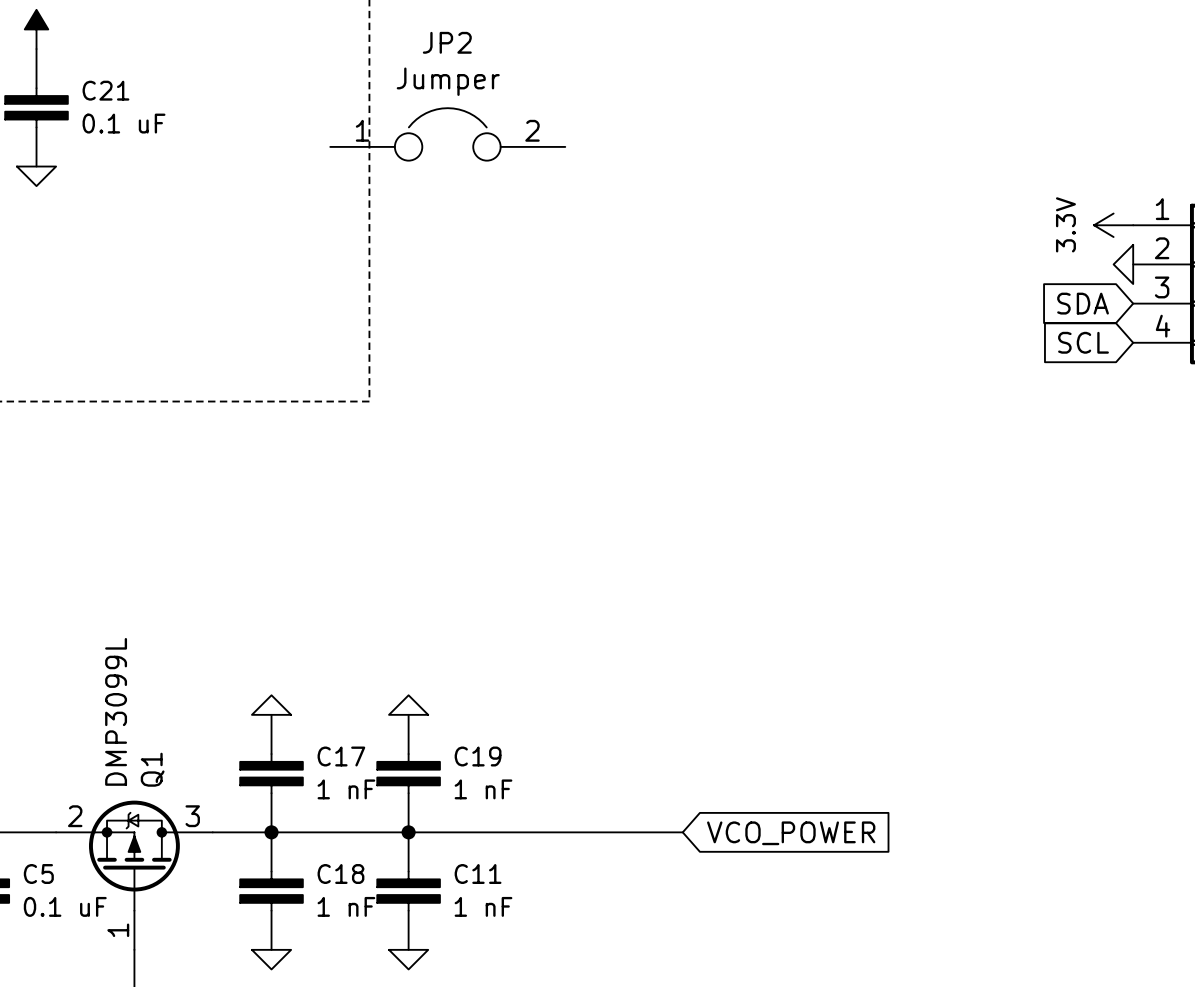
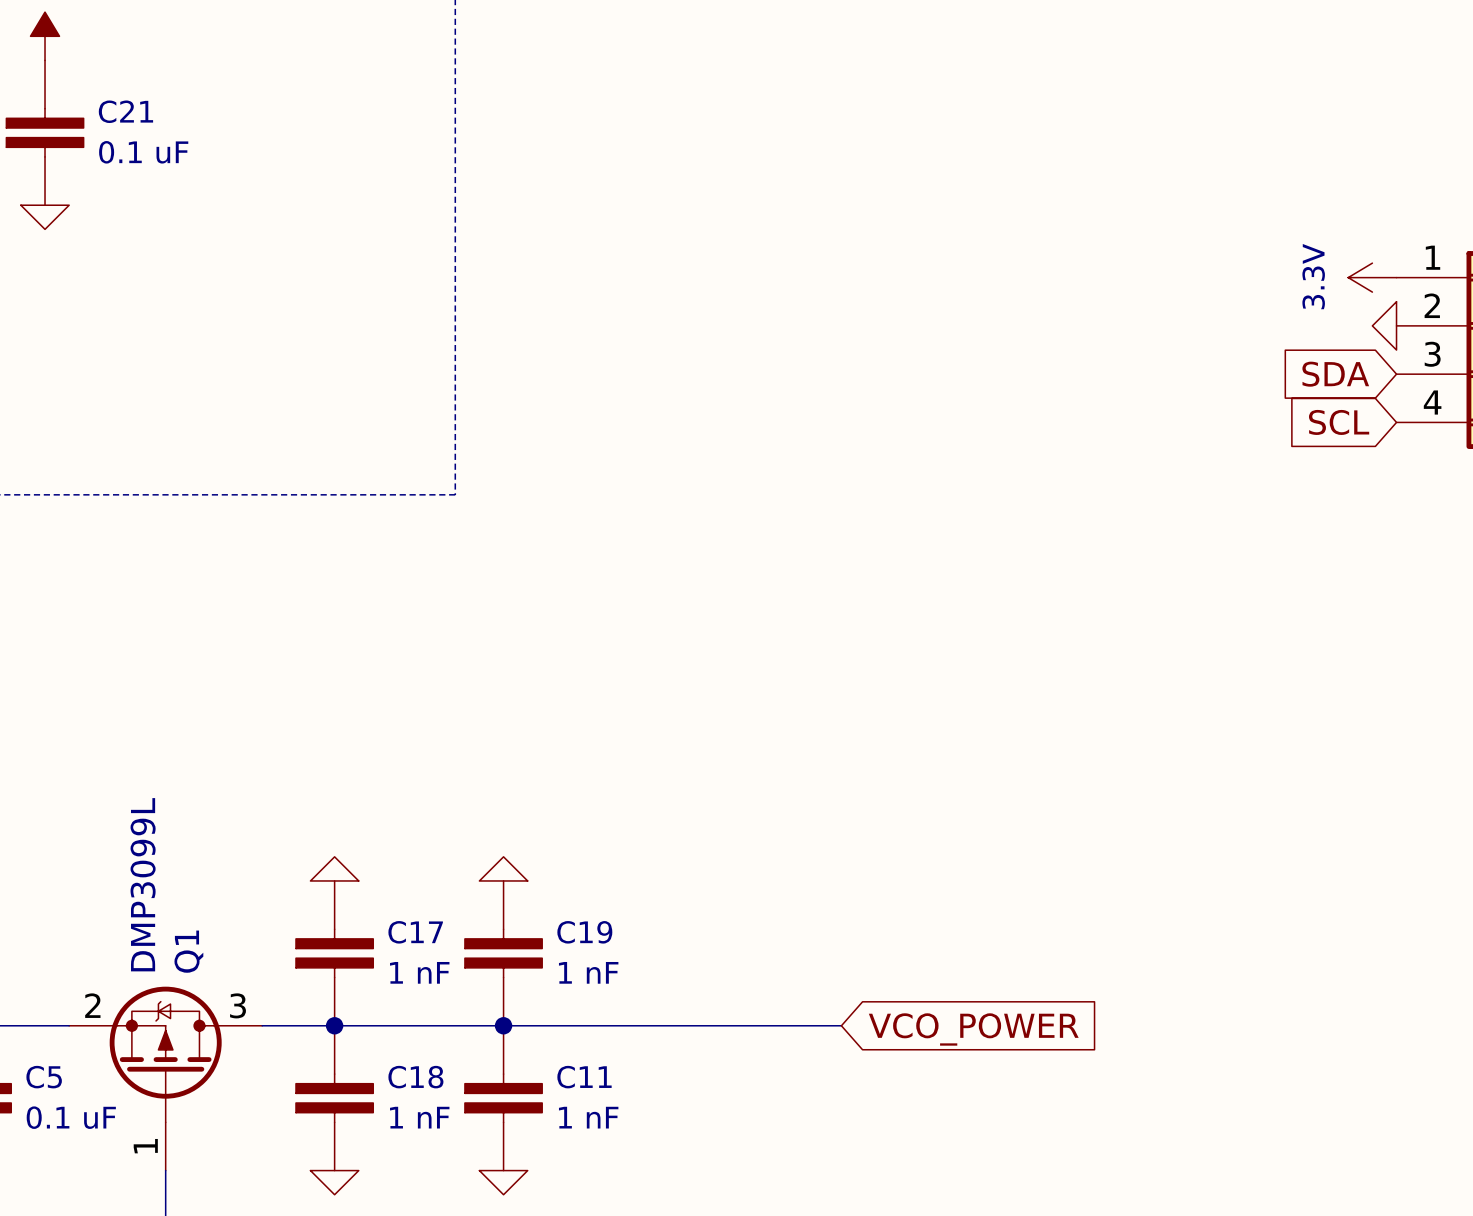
JP2: Jumper (447, 134) -> none

